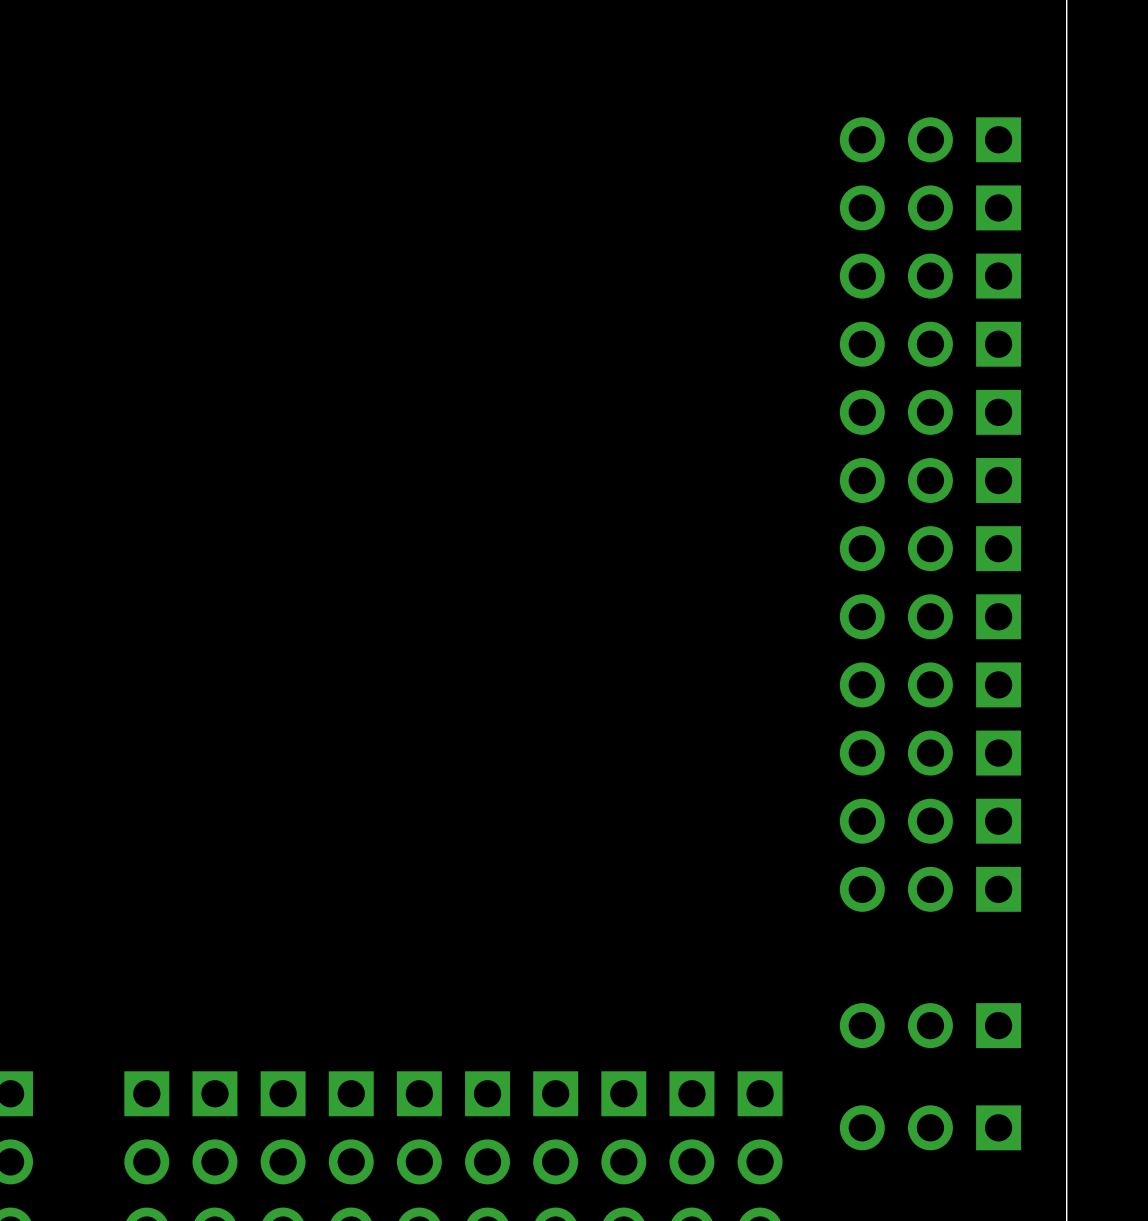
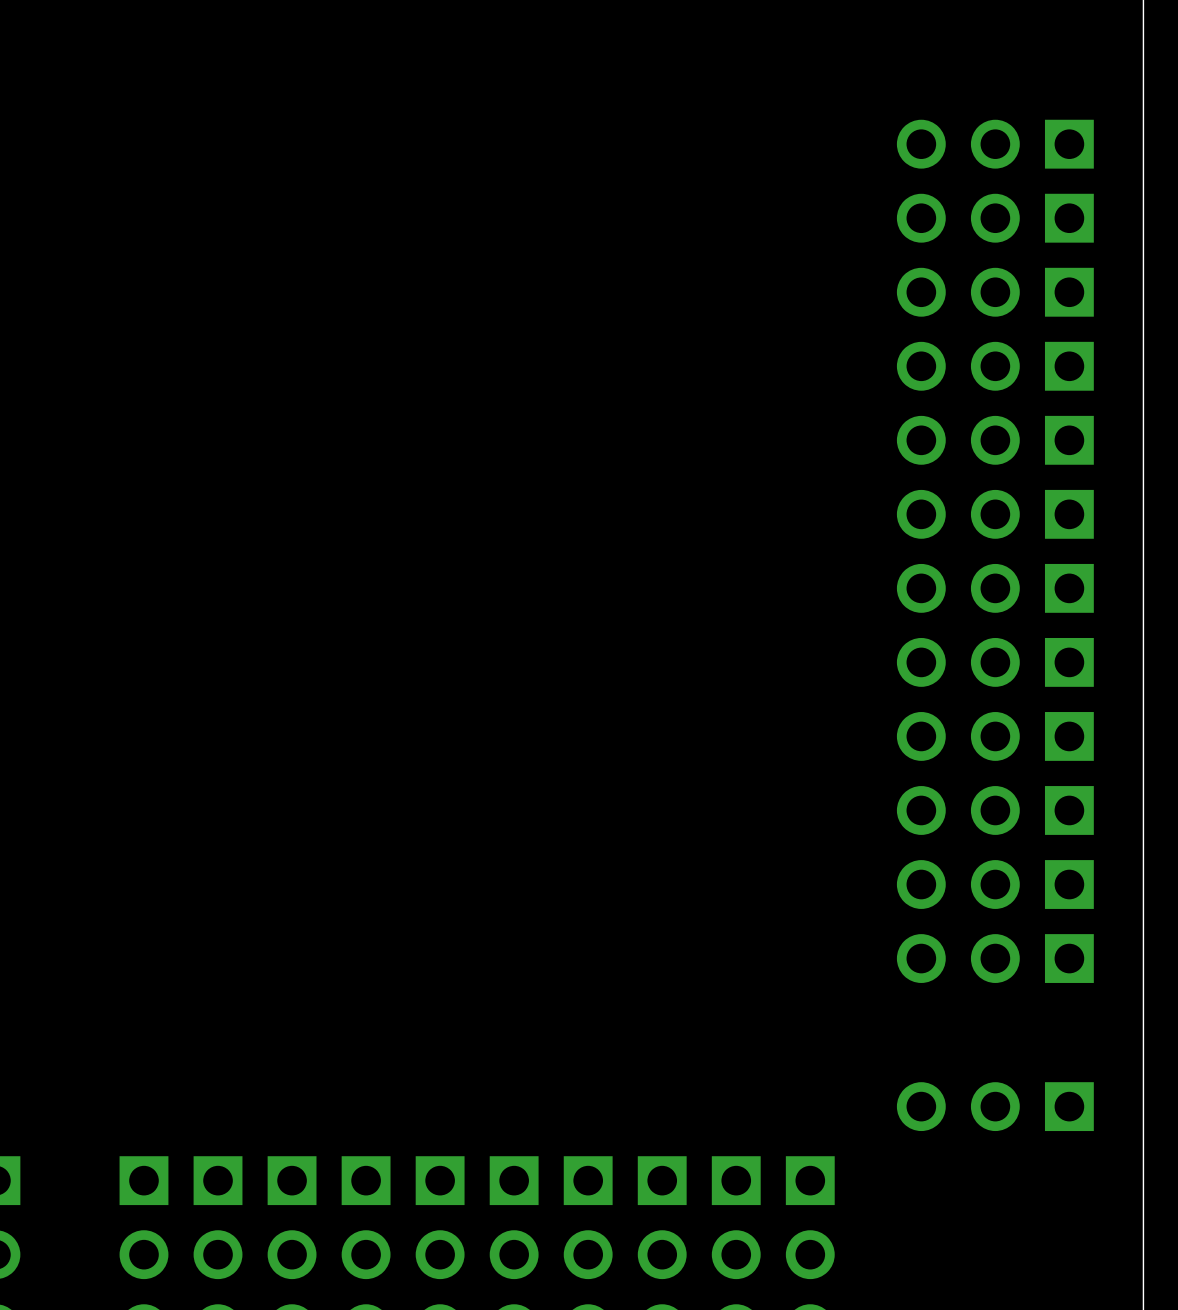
part: (930, 1127) -> none

